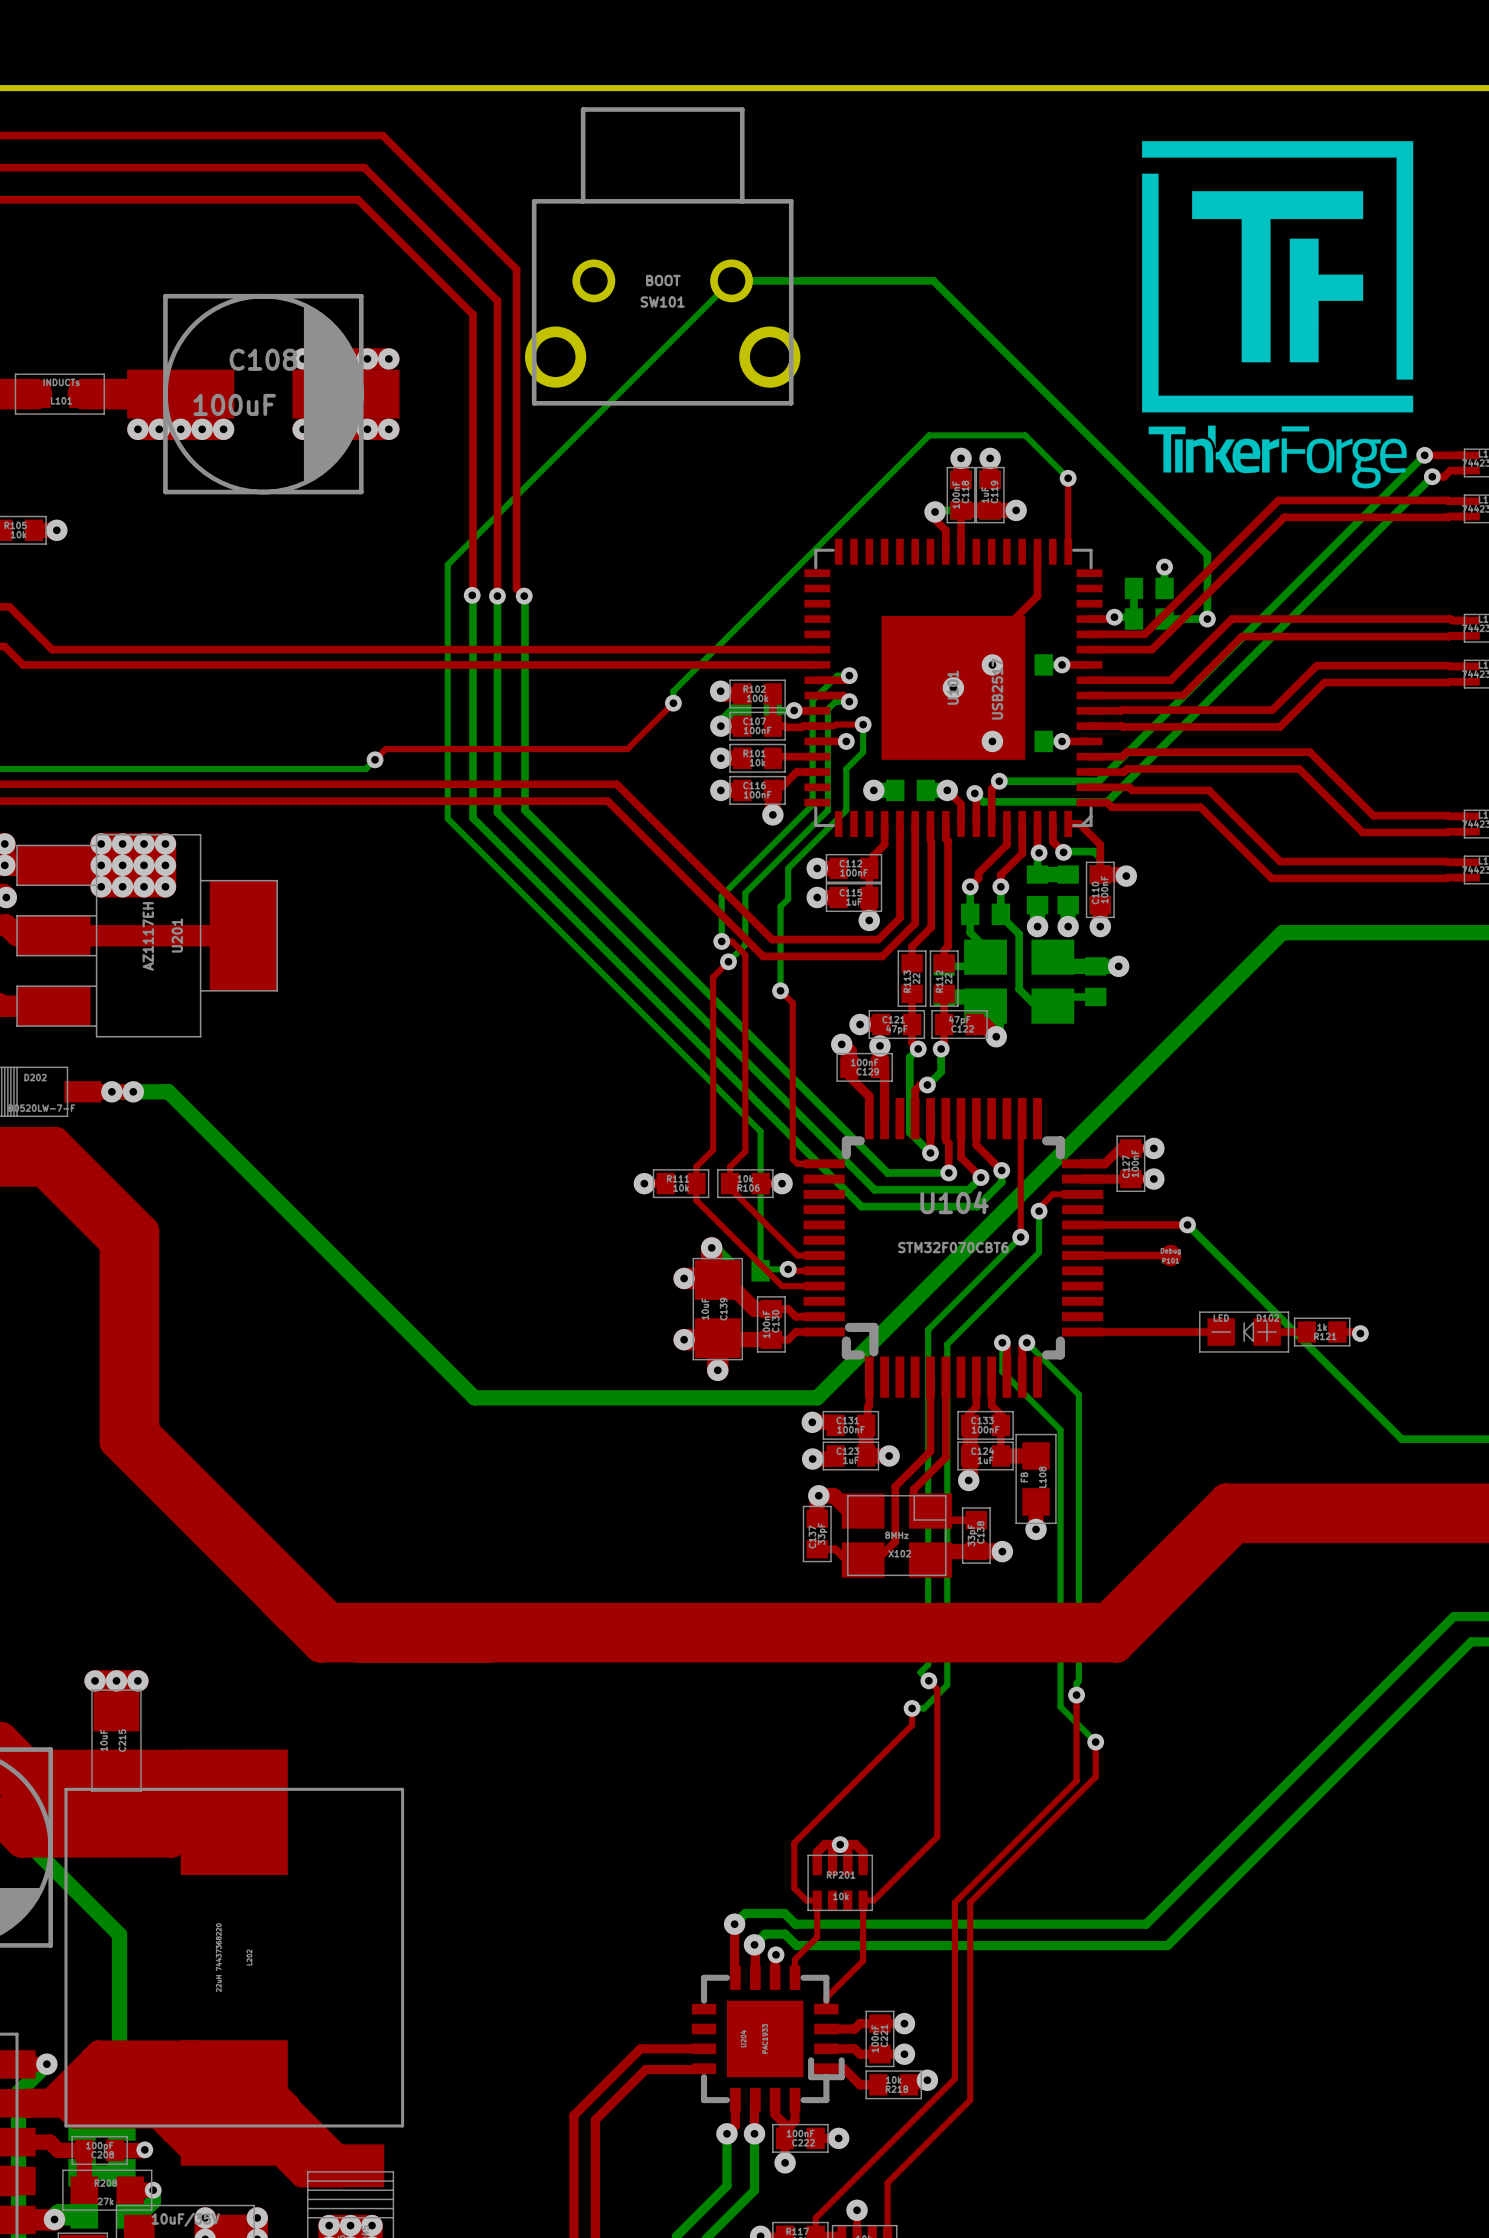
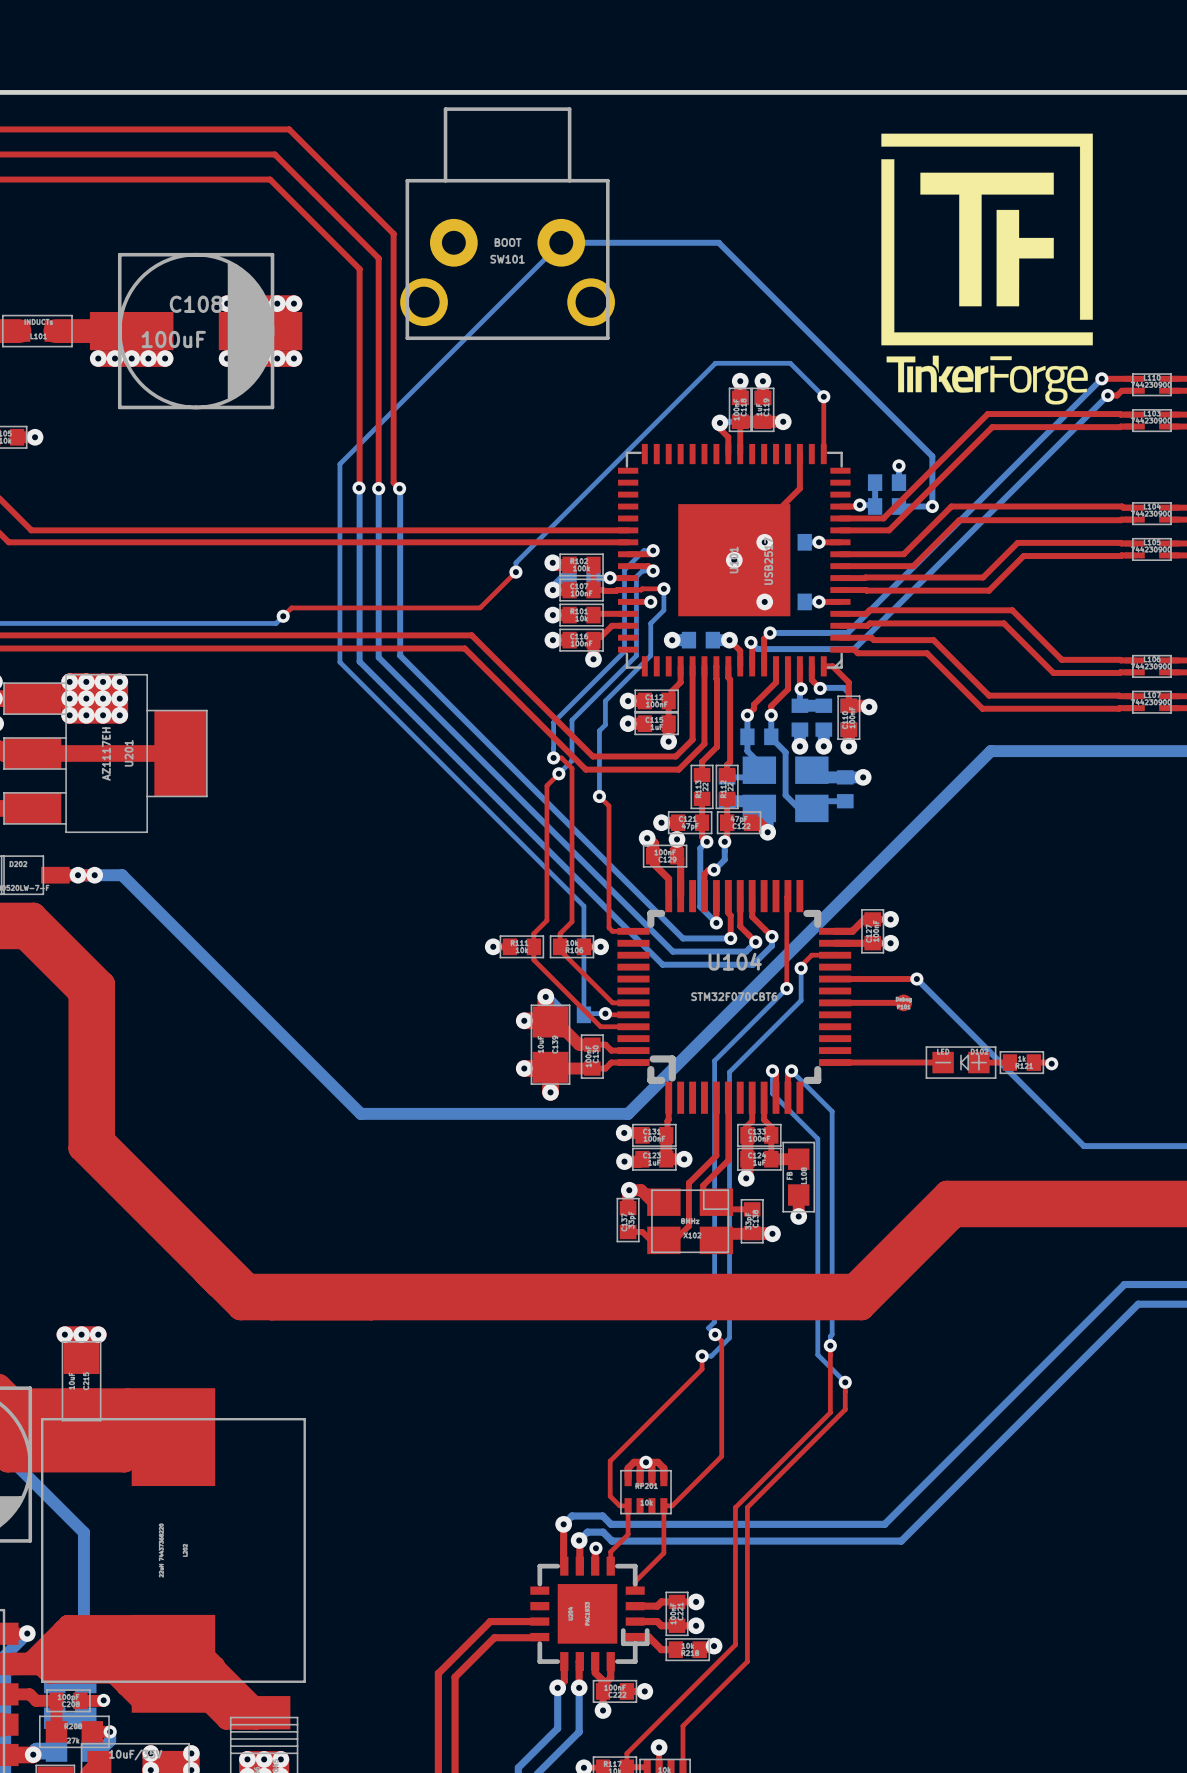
SW101 footprint: [525, 107, 801, 406] -> [400, 107, 615, 341]

